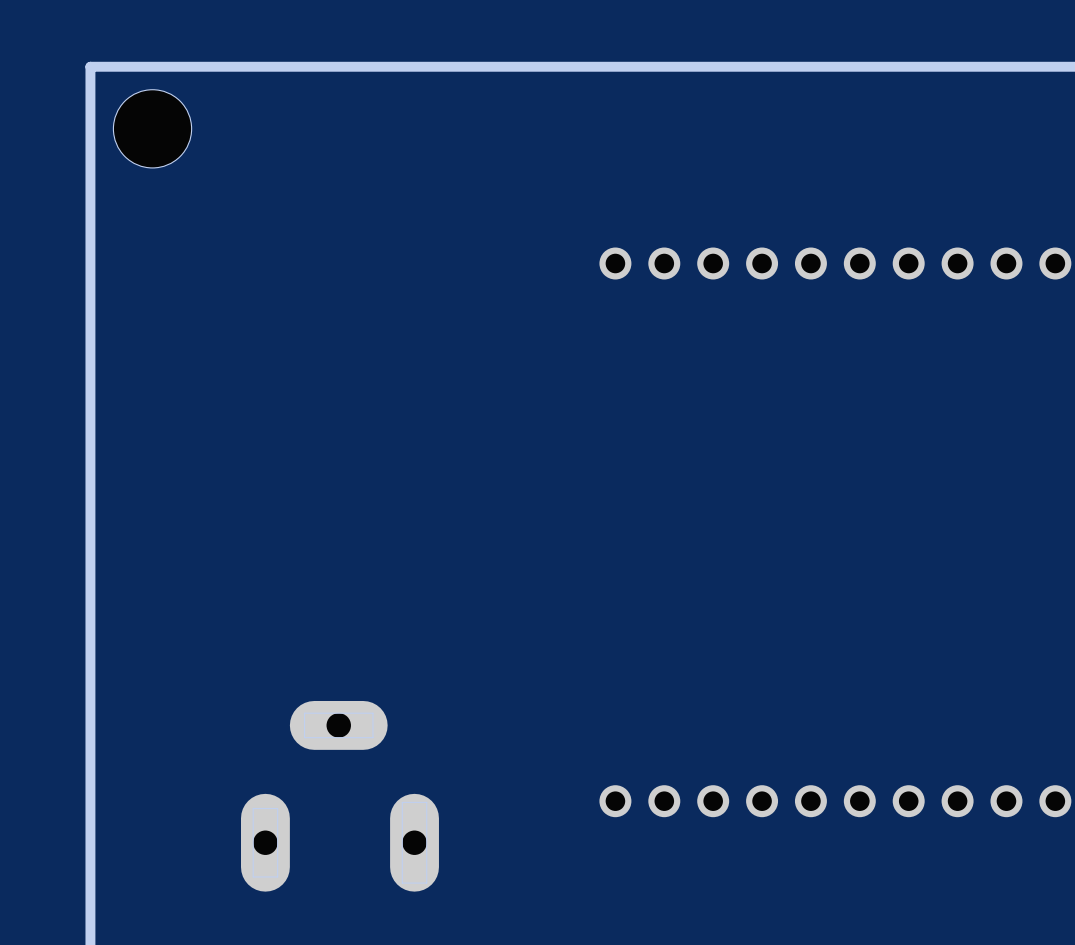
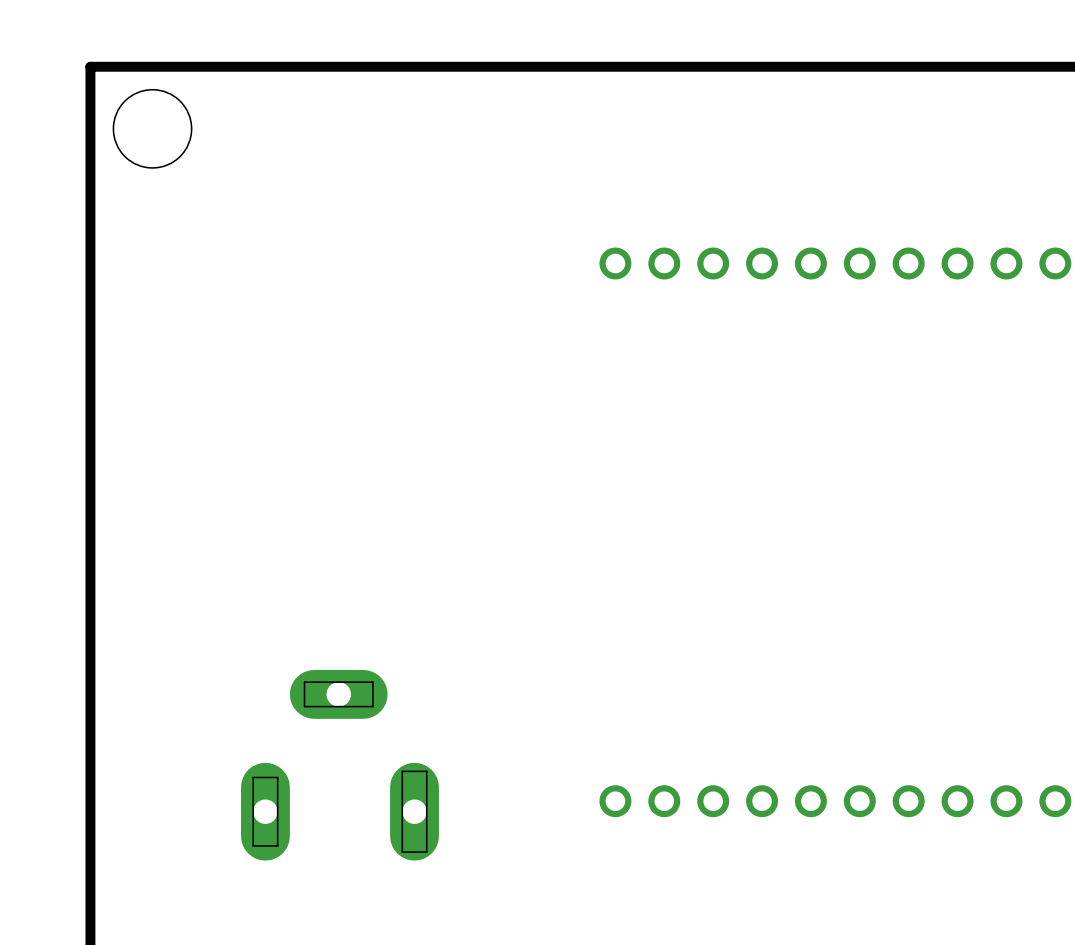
part position: (339, 796) -> (339, 765)

